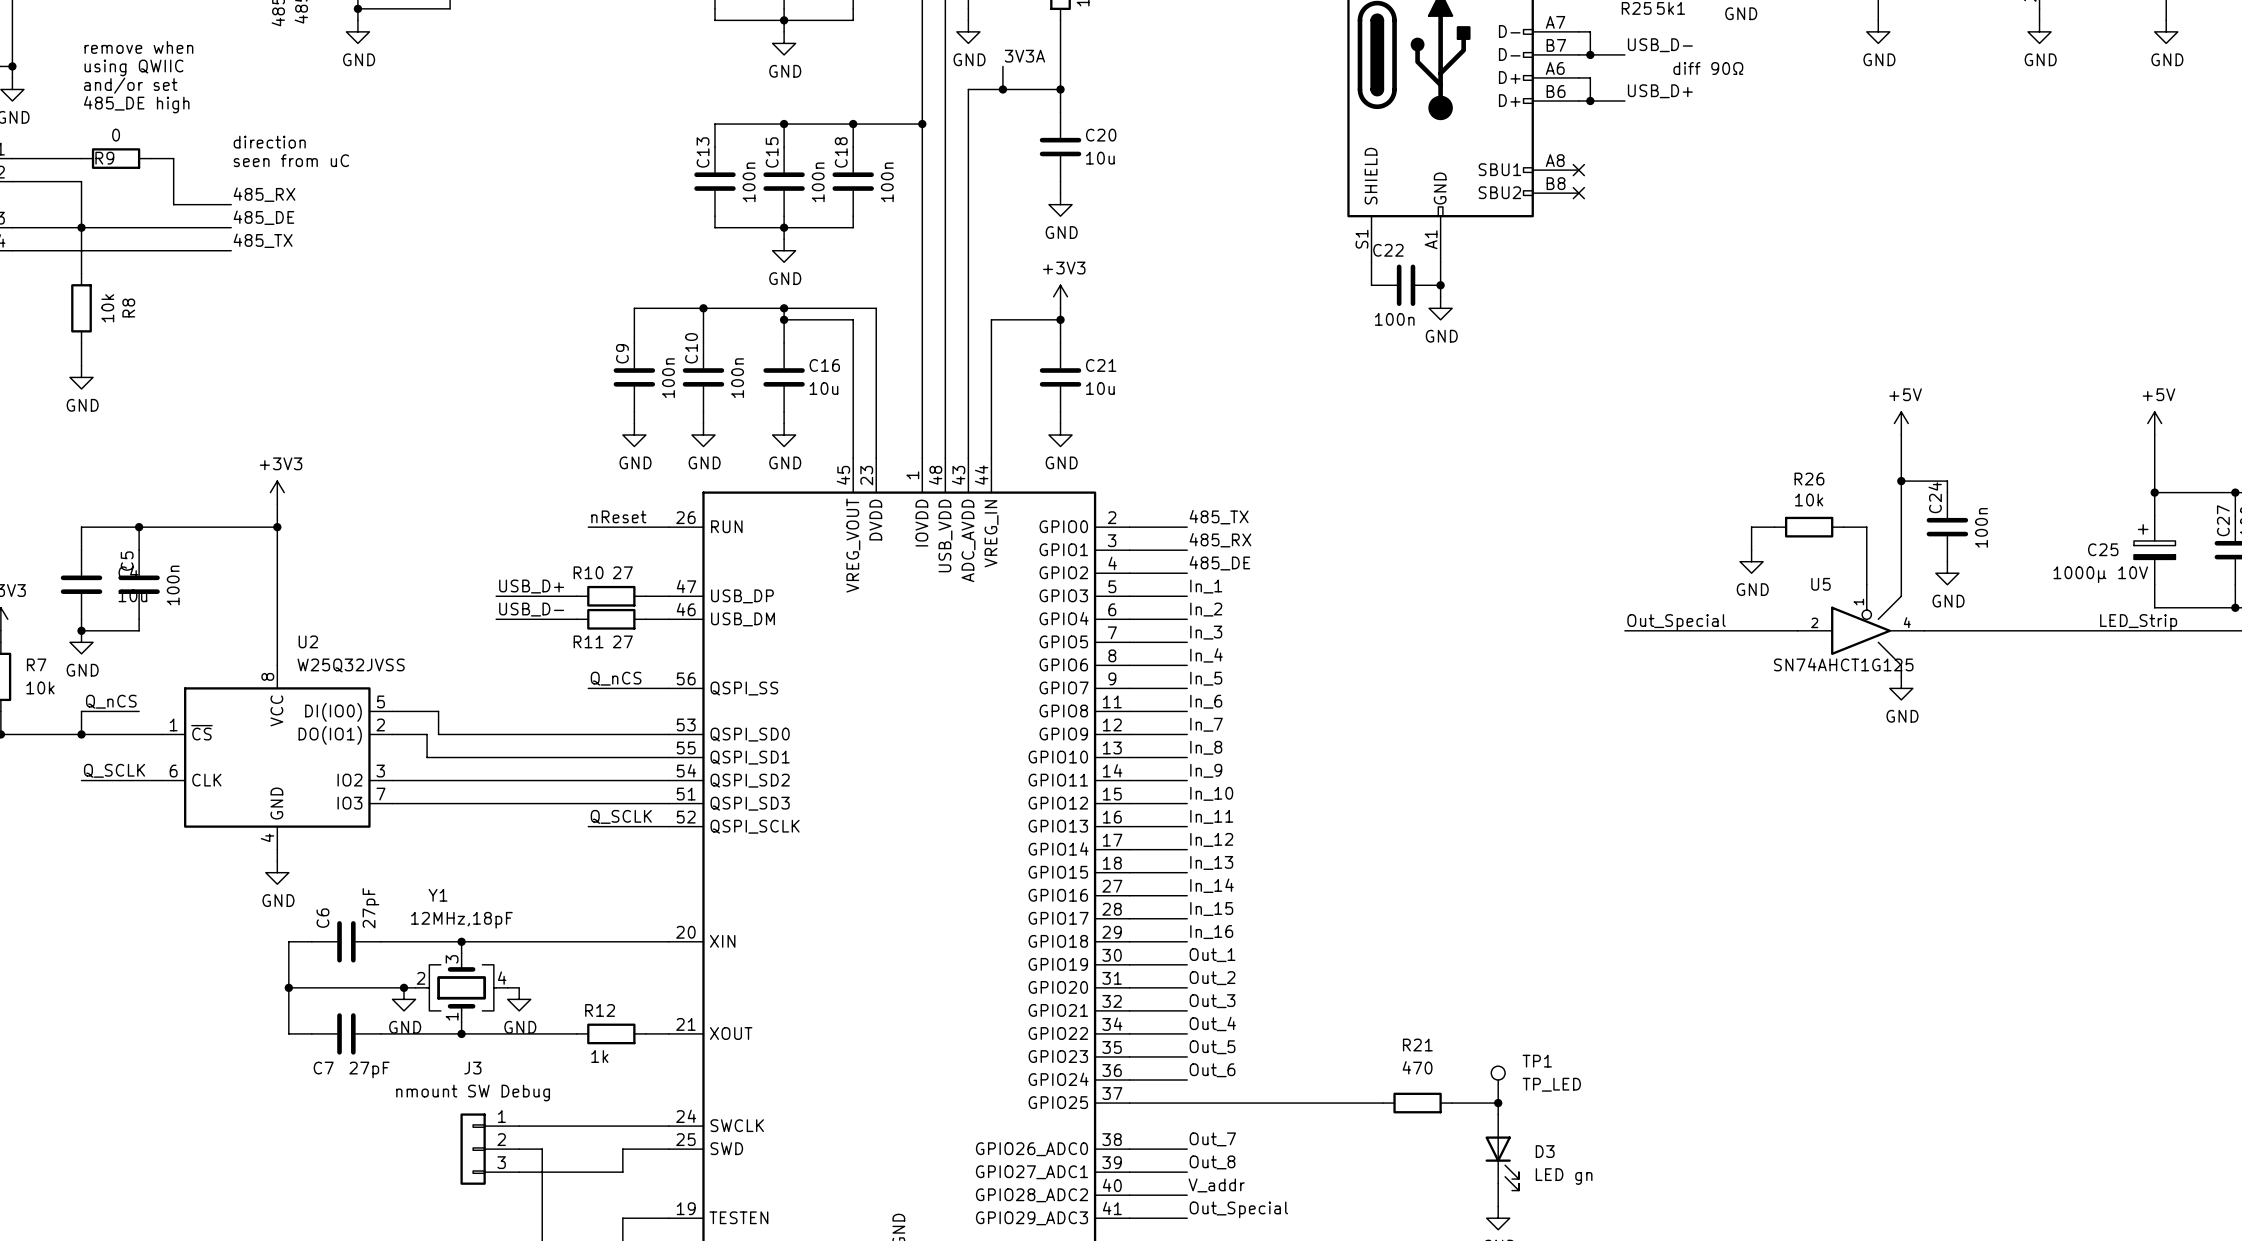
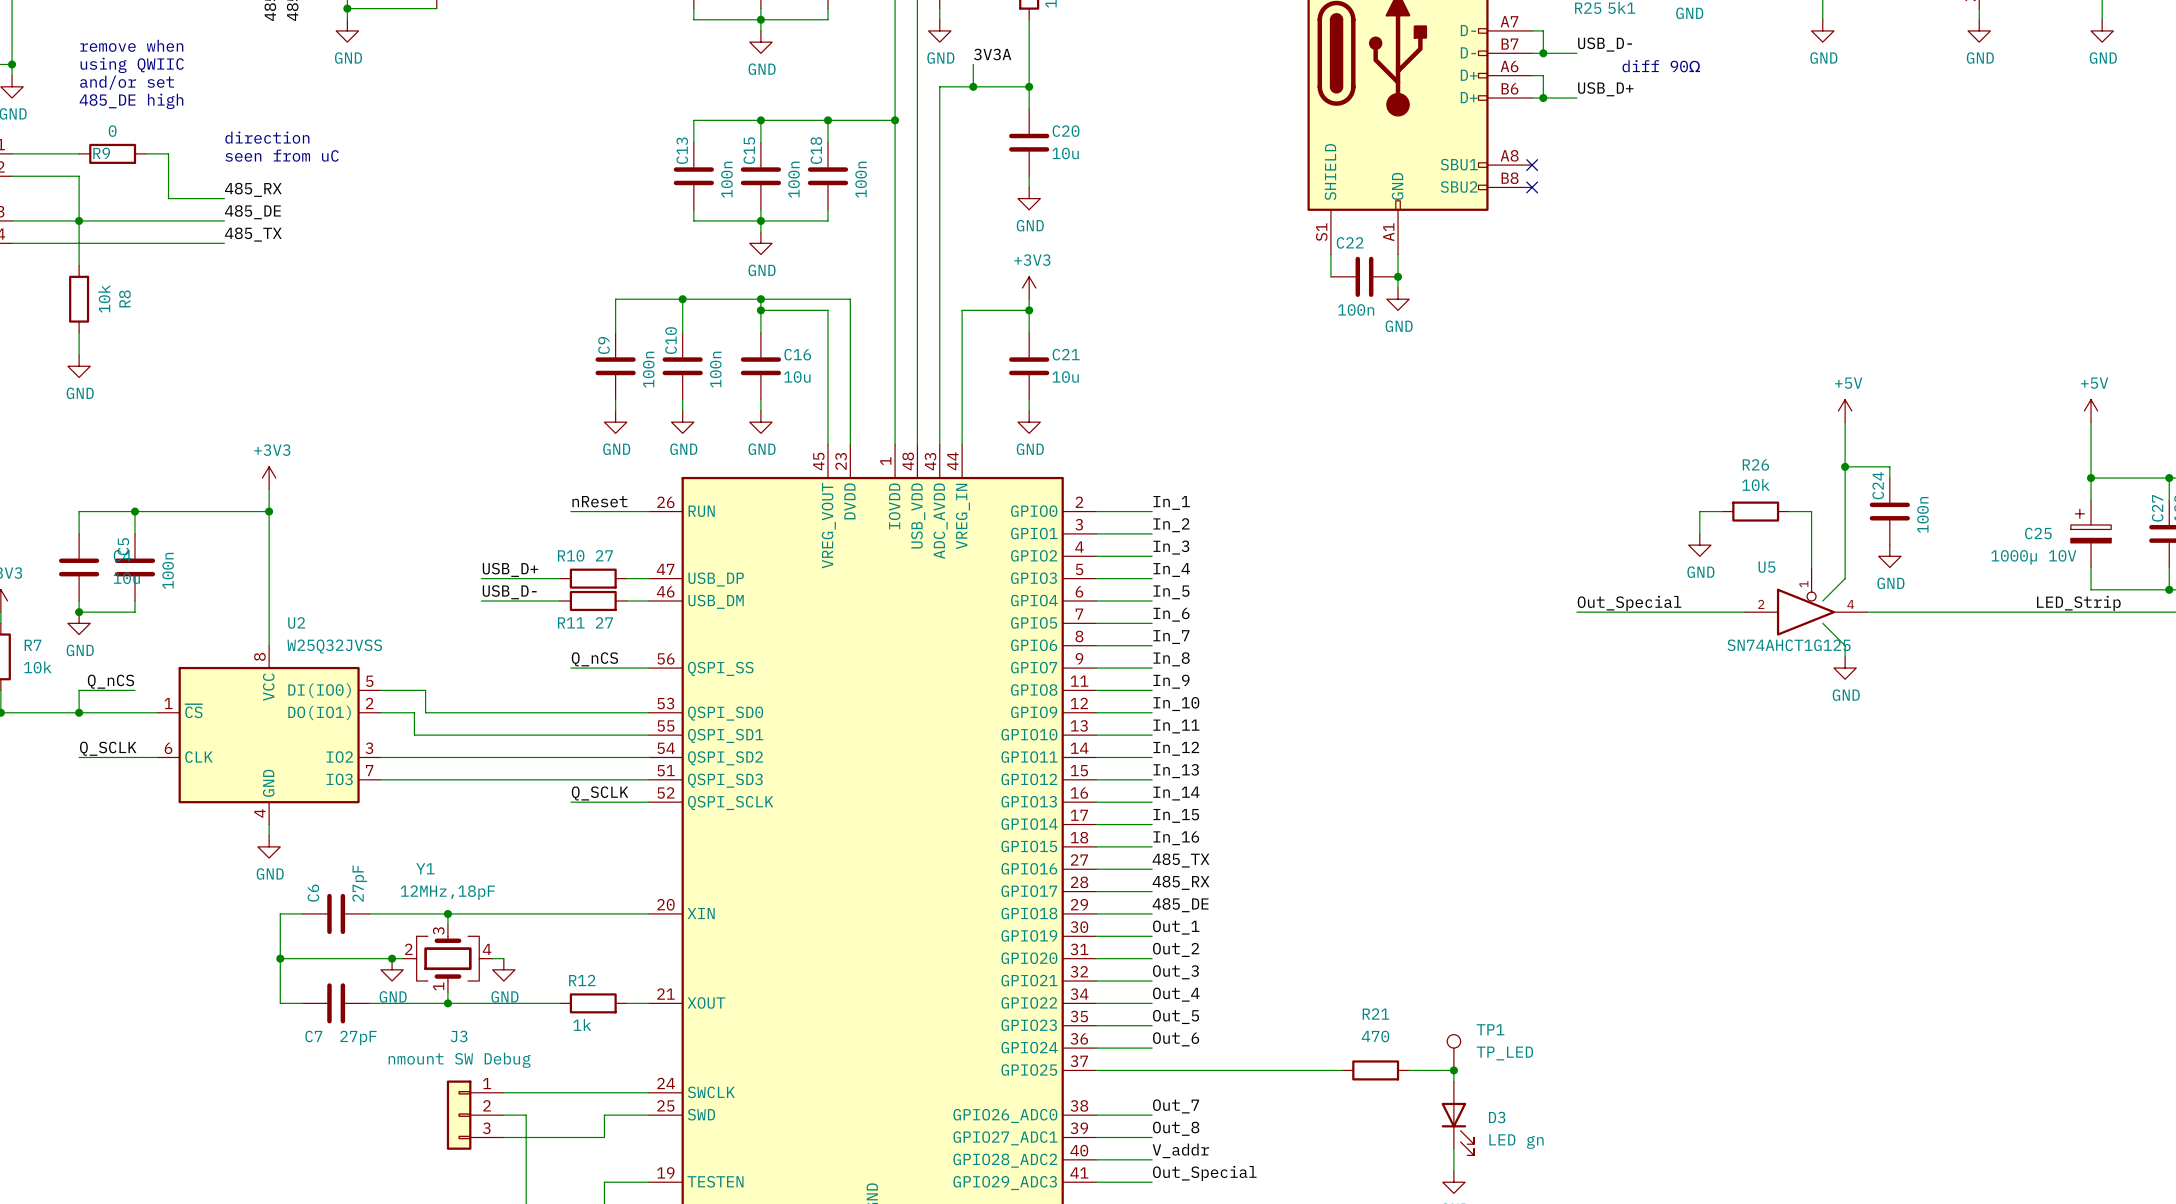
label: 485_TX (1219, 517) -> In_1 (1171, 502)
label: 485_RX (1220, 540) -> In_2 (1171, 525)
label: 485_DE (1219, 563) -> In_3 (1171, 547)
label: In_1 (1206, 586) -> In_4 (1171, 570)
label: In_2 (1206, 609) -> In_5 (1171, 592)
label: In_3 (1206, 632) -> In_6 (1171, 614)
label: In_4 (1206, 655) -> In_7 (1171, 637)
label: In_5 (1206, 678) -> In_8 (1171, 659)
label: In_6 (1206, 701) -> In_9 (1171, 681)
label: In_7 (1206, 724) -> In_10 (1176, 704)
label: In_8 (1206, 747) -> In_11 (1176, 726)
label: In_9 (1206, 770) -> In_12 (1176, 748)
label: In_10 (1211, 793) -> In_13 (1176, 771)
label: In_11 (1211, 816) -> In_14 (1176, 793)
label: In_12 (1211, 839) -> In_15 (1176, 815)
label: In_13 (1211, 862) -> In_16 (1176, 838)
label: In_14 (1211, 885) -> 485_TX (1181, 860)
label: In_15 (1211, 909) -> 485_RX (1181, 882)
label: In_16 (1211, 932) -> 485_DE (1180, 905)

